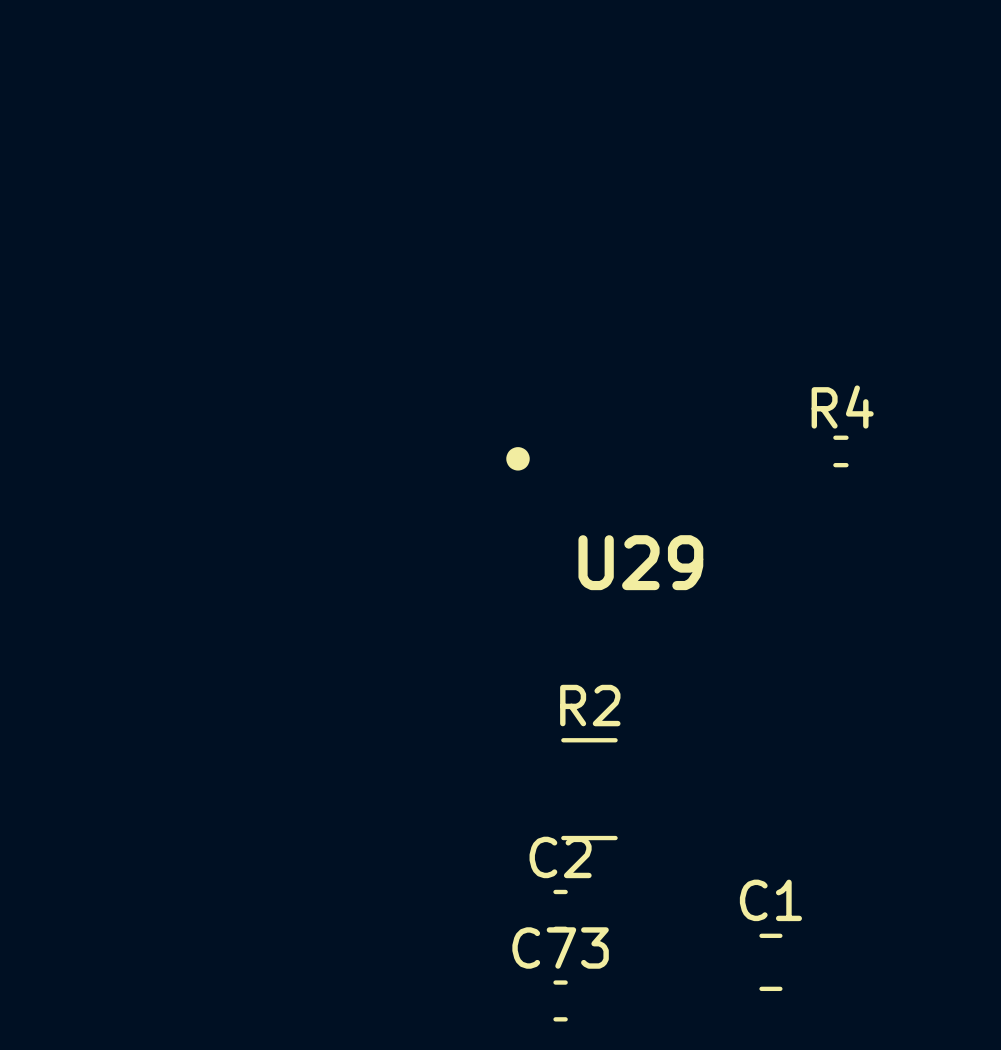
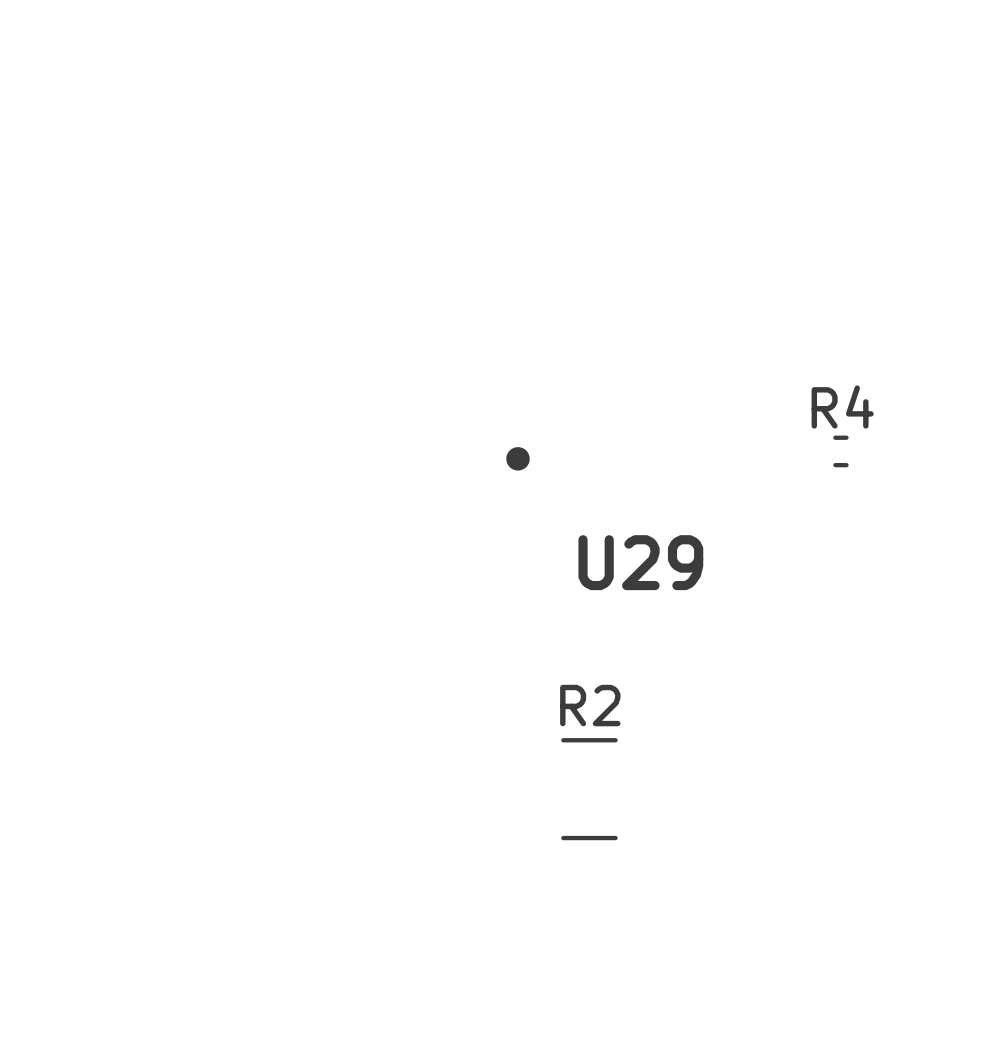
C2: (560, 910) -> none
C1: (770, 962) -> none
C73: (560, 1000) -> none

